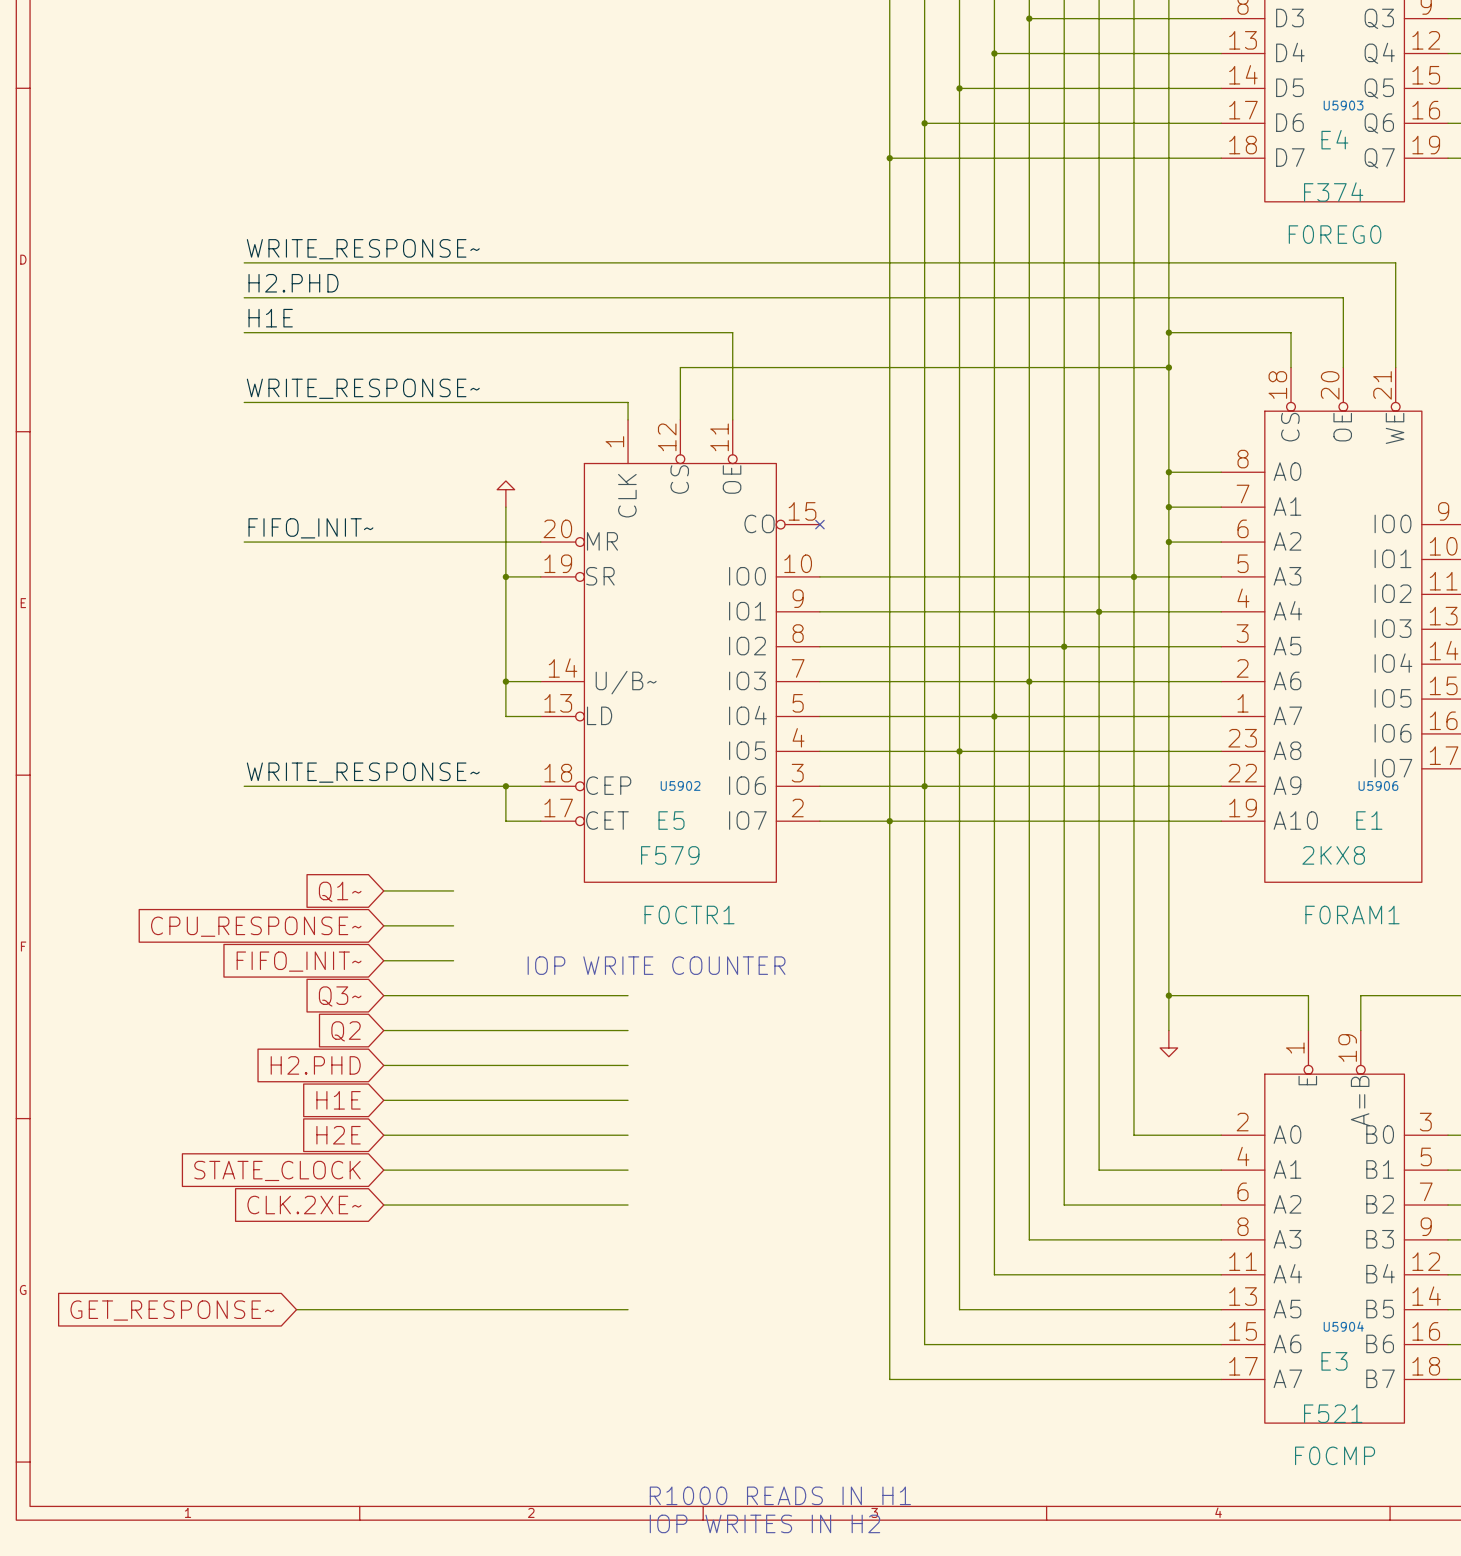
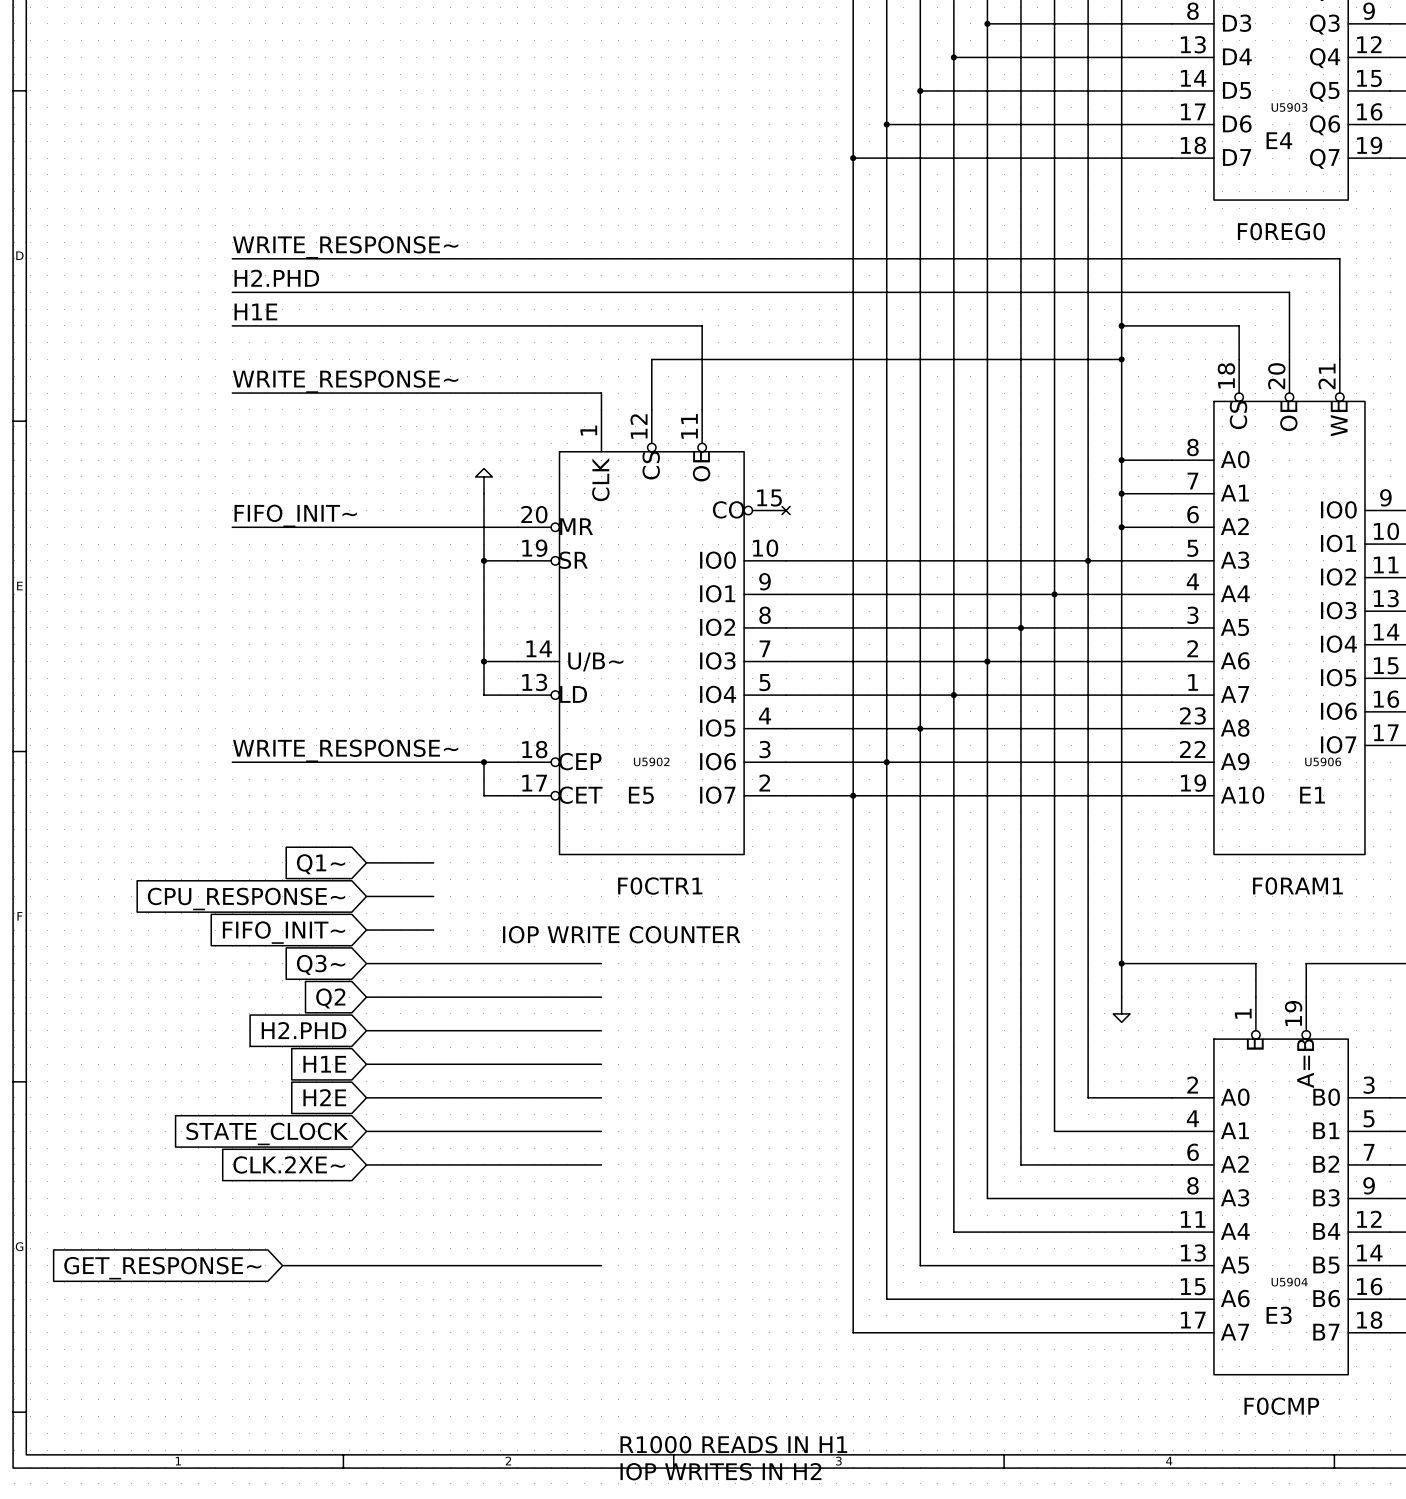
U5903 value: F374 (1333, 192) -> none
U5902 value: F579 (670, 855) -> none
U5906 value: 2KX8 (1333, 855) -> none
U5904 value: F521 (1333, 1413) -> none

